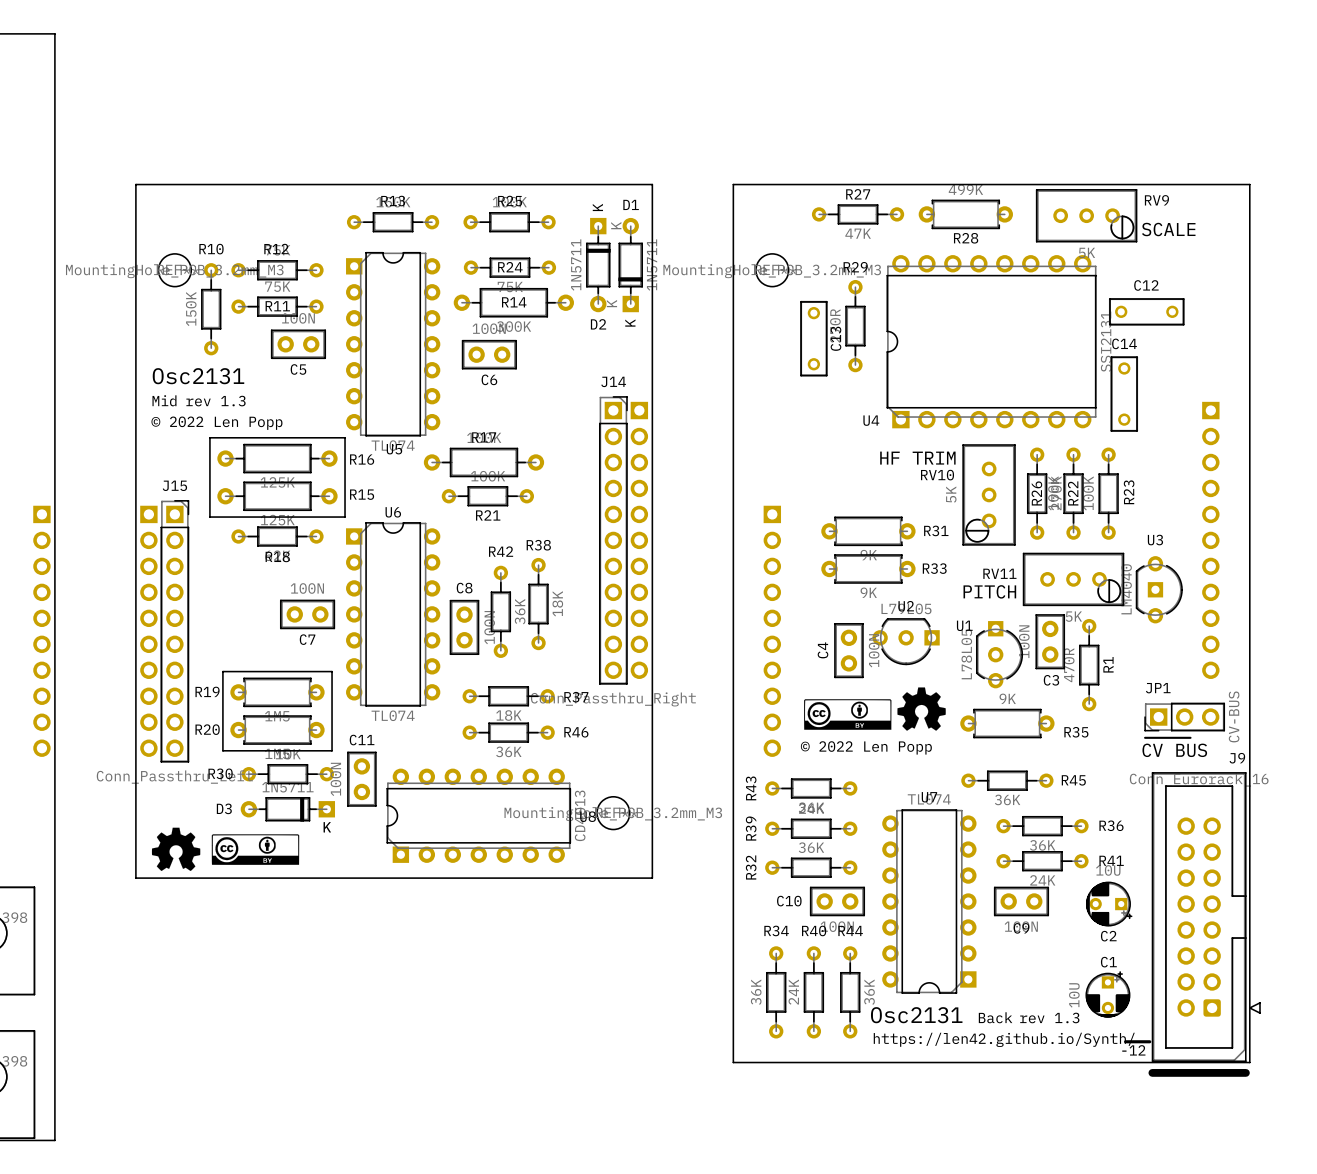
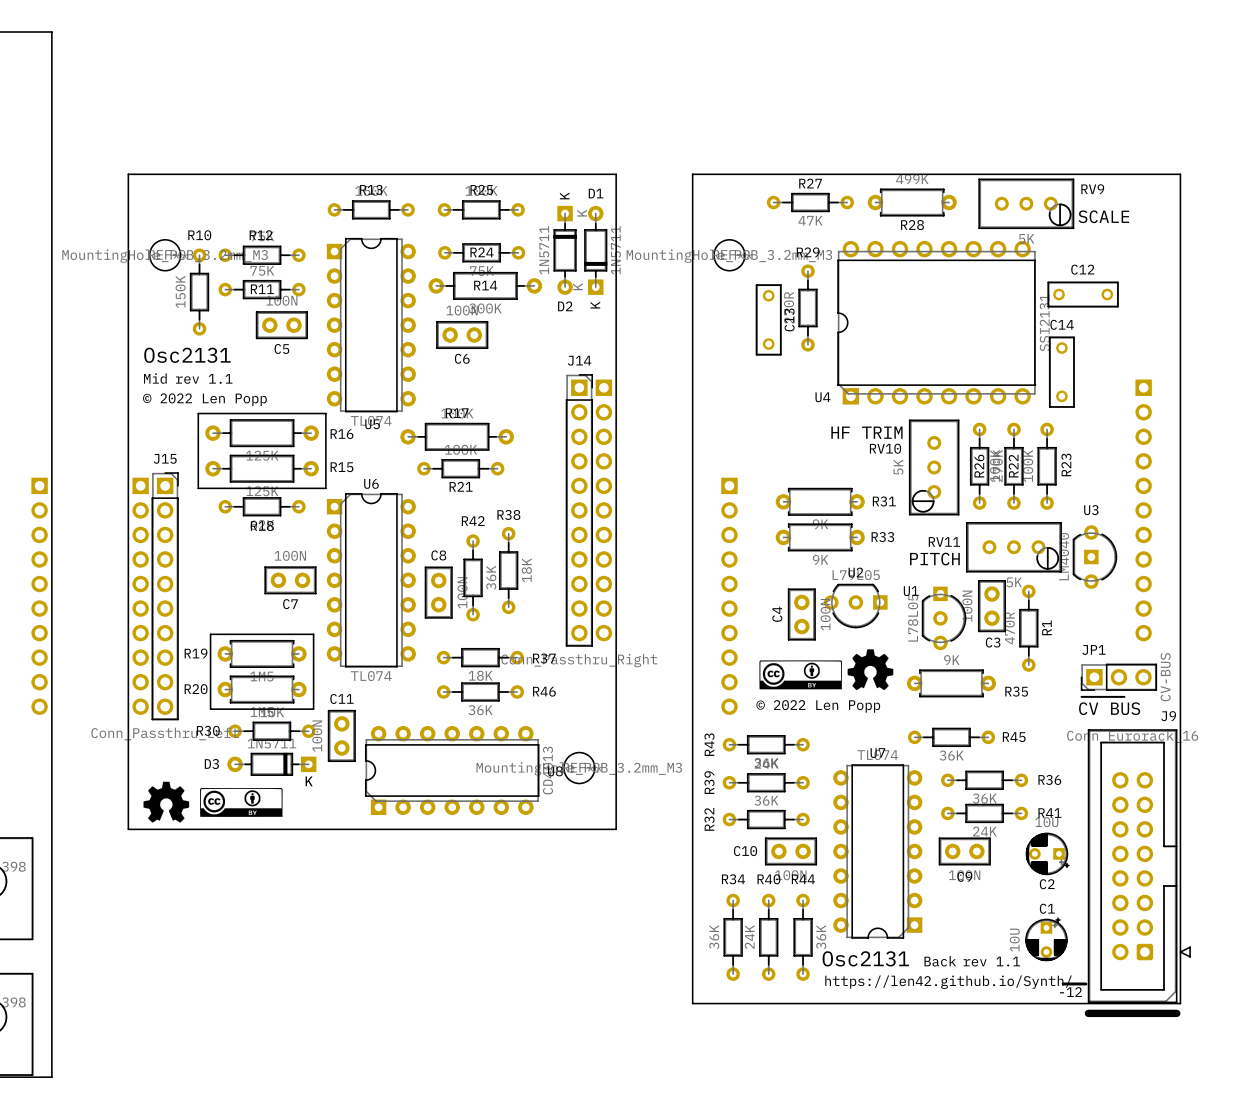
text: rev 1.3 (215, 401) -> rev 1.1 (204, 378)
text: rev 1.3 (1049, 1017) -> rev 1.1 (991, 961)

